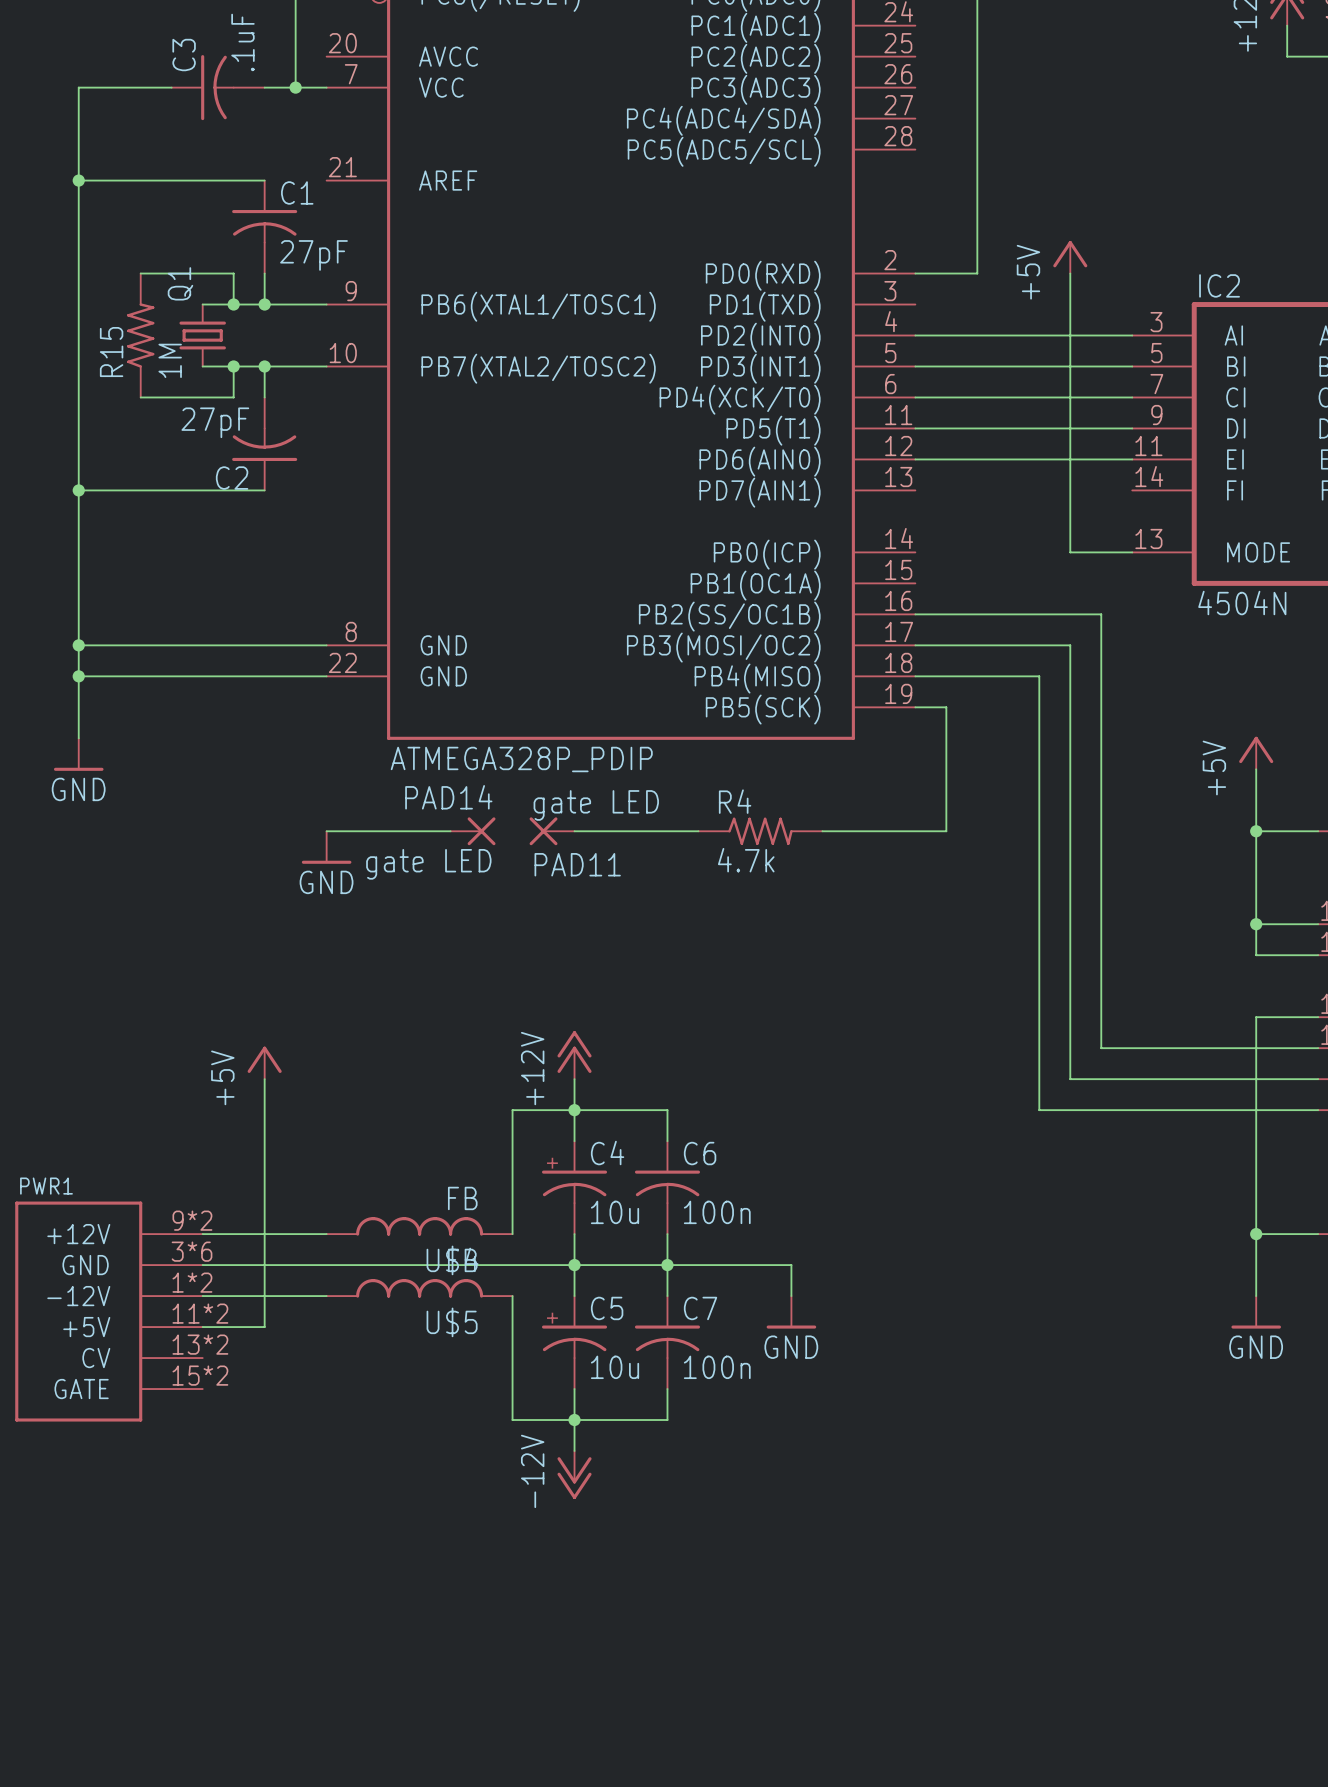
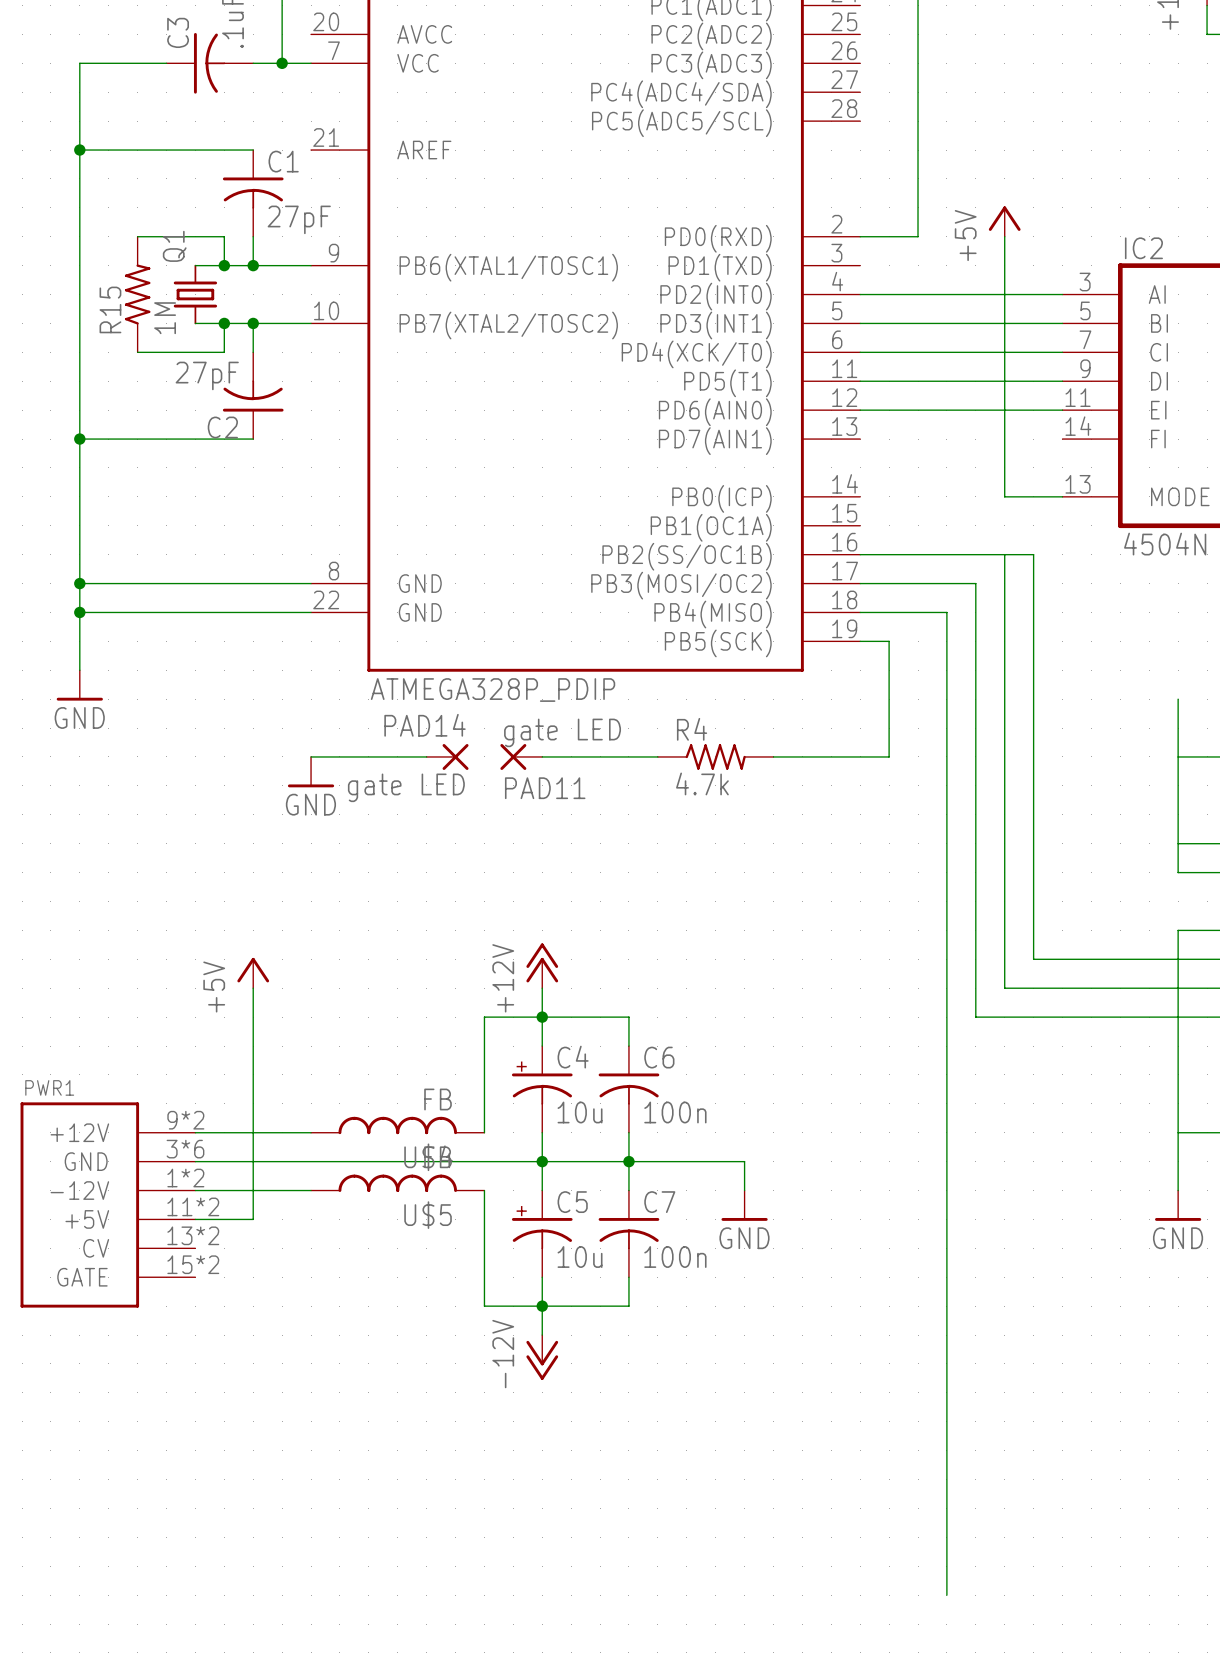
wire: (1039, 645) (1070, 645) -> (1004, 554) (1004, 583)
wire: (1008, 676) (1039, 676) -> (975, 583) (975, 612)
wire: none -> (946, 612) (946, 1595)
power symbol: +5V (1256, 753) -> none
junction: (1256, 831) -> none
junction: (1256, 924) -> none
junction: (1256, 1234) -> none

